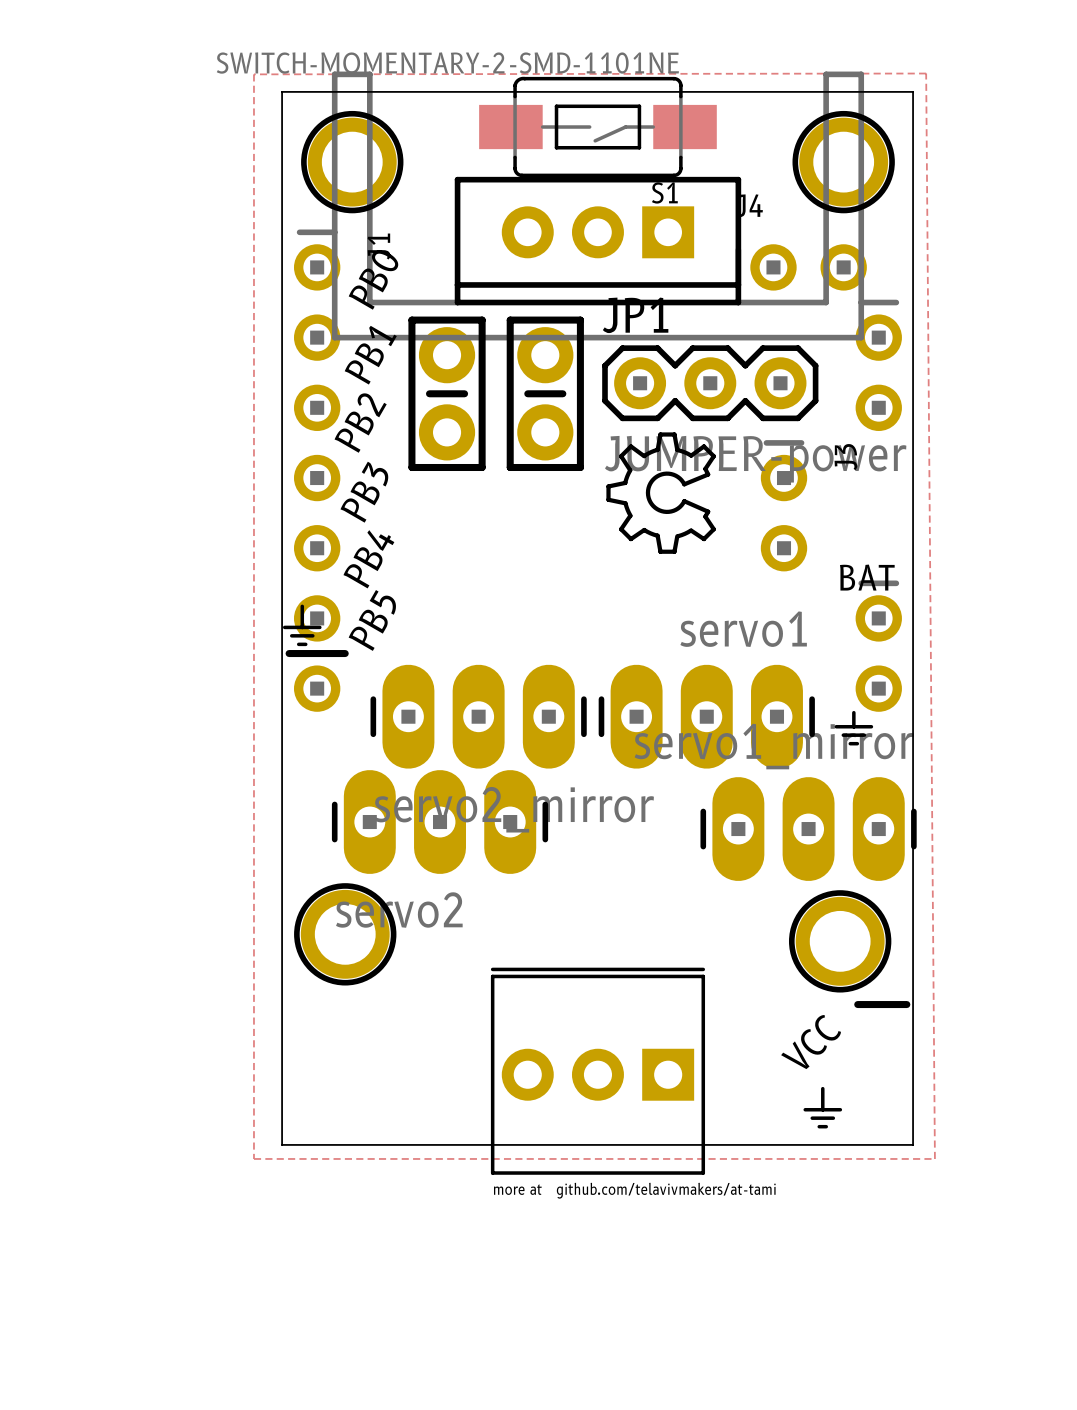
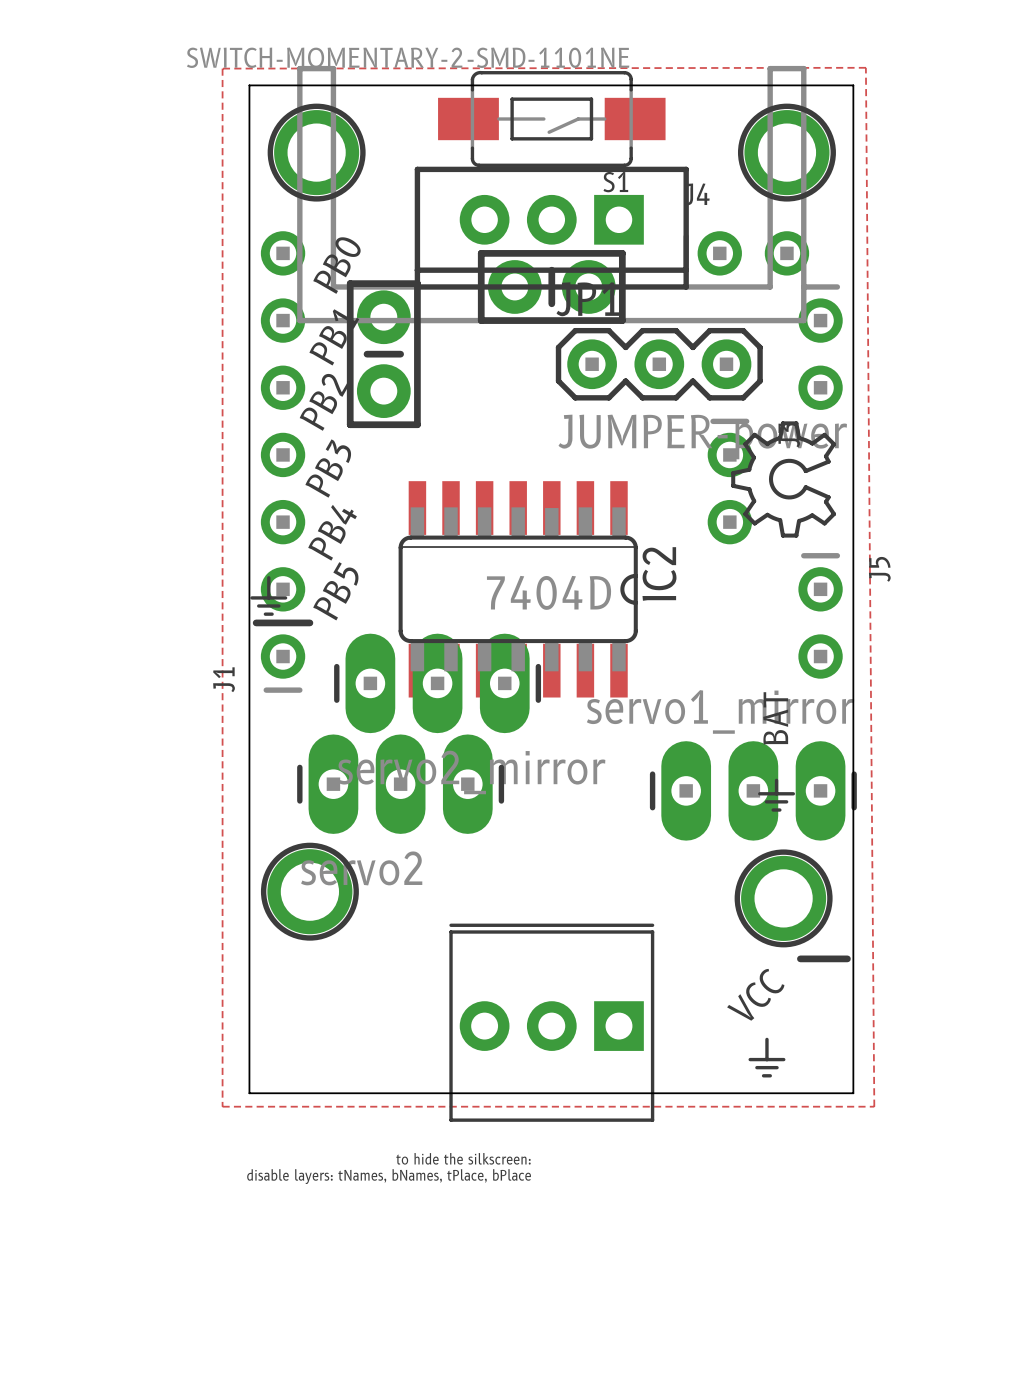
part: none -> (551, 286)
part position: (447, 393) -> (383, 354)
part: (545, 393) -> none
J1 rotation: 0° (317, 470) -> 180° (283, 462)
drawing position: (661, 493) -> (783, 479)
text rotation: 0° (867, 577) -> 90° counterclockwise (775, 718)
text position: BAT (867, 577) -> BAT (775, 718)
J5 name: none -> J5 (879, 569)
IC2: none -> 7404D (518, 589)
line: (853, 712) (853, 726) -> (776, 780) (776, 793)
part: servo1 (706, 716) -> none
line: (836, 726) (871, 726) -> (759, 793) (793, 793)
line: (843, 735) (864, 735) -> (766, 801) (786, 801)
line: (850, 743) (857, 743) -> (773, 810) (779, 810)
text: more at github.com/telavivmakers/at-tami (634, 1190) -> none
text: none -> to hide the silkscreen: (463, 1158)
text: none -> disable layers: tNames, bNames, tPlace, bPlace (389, 1176)

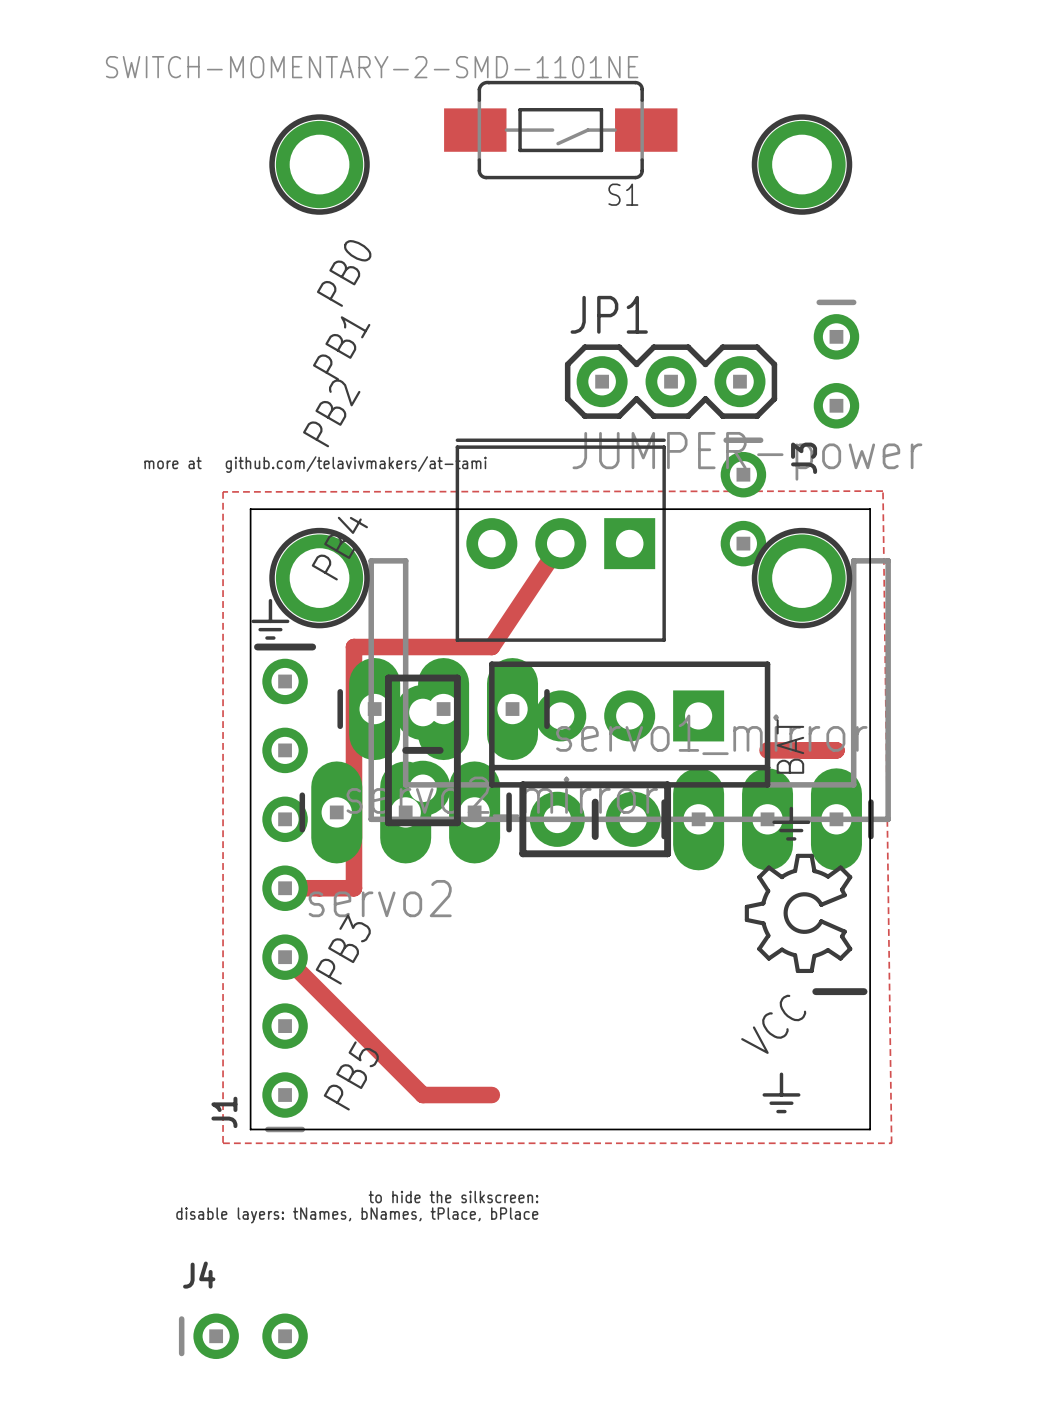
part position: (551, 194) -> (629, 690)
J4 position: (746, 253) -> (243, 1336)
part: (551, 286) -> none
part: (383, 354) -> none
text: none -> more at github.com/telavivmakers/at-tami (315, 464)
J1 position: (283, 462) -> (285, 895)
text position: PB3 (328, 468) -> PB3 (343, 949)
zone outline: (222, 471) (222, 68) (865, 67) (874, 1106) -> (223, 491) (882, 491) (891, 1143)
drawing position: (783, 479) -> (798, 913)
board edge: (249, 488) (249, 85) (853, 85) (853, 488) -> (250, 509) (870, 509)
track: none -> (560, 543) (491, 647) (353, 647) (353, 888) (285, 888)
part: none -> (319, 578)
part: none -> (802, 578)
IC2: 7404D (518, 589) -> none
text position: PB5 (335, 591) -> PB5 (351, 1075)
J5: (820, 615) -> none
part: none -> (422, 750)
track: none -> (767, 750) (836, 750)
part: none -> (595, 819)
part: (309, 891) -> none
part: (783, 898) -> none
track: none -> (285, 957) (422, 1095) (491, 1095)
part position: (551, 1022) -> (560, 540)

